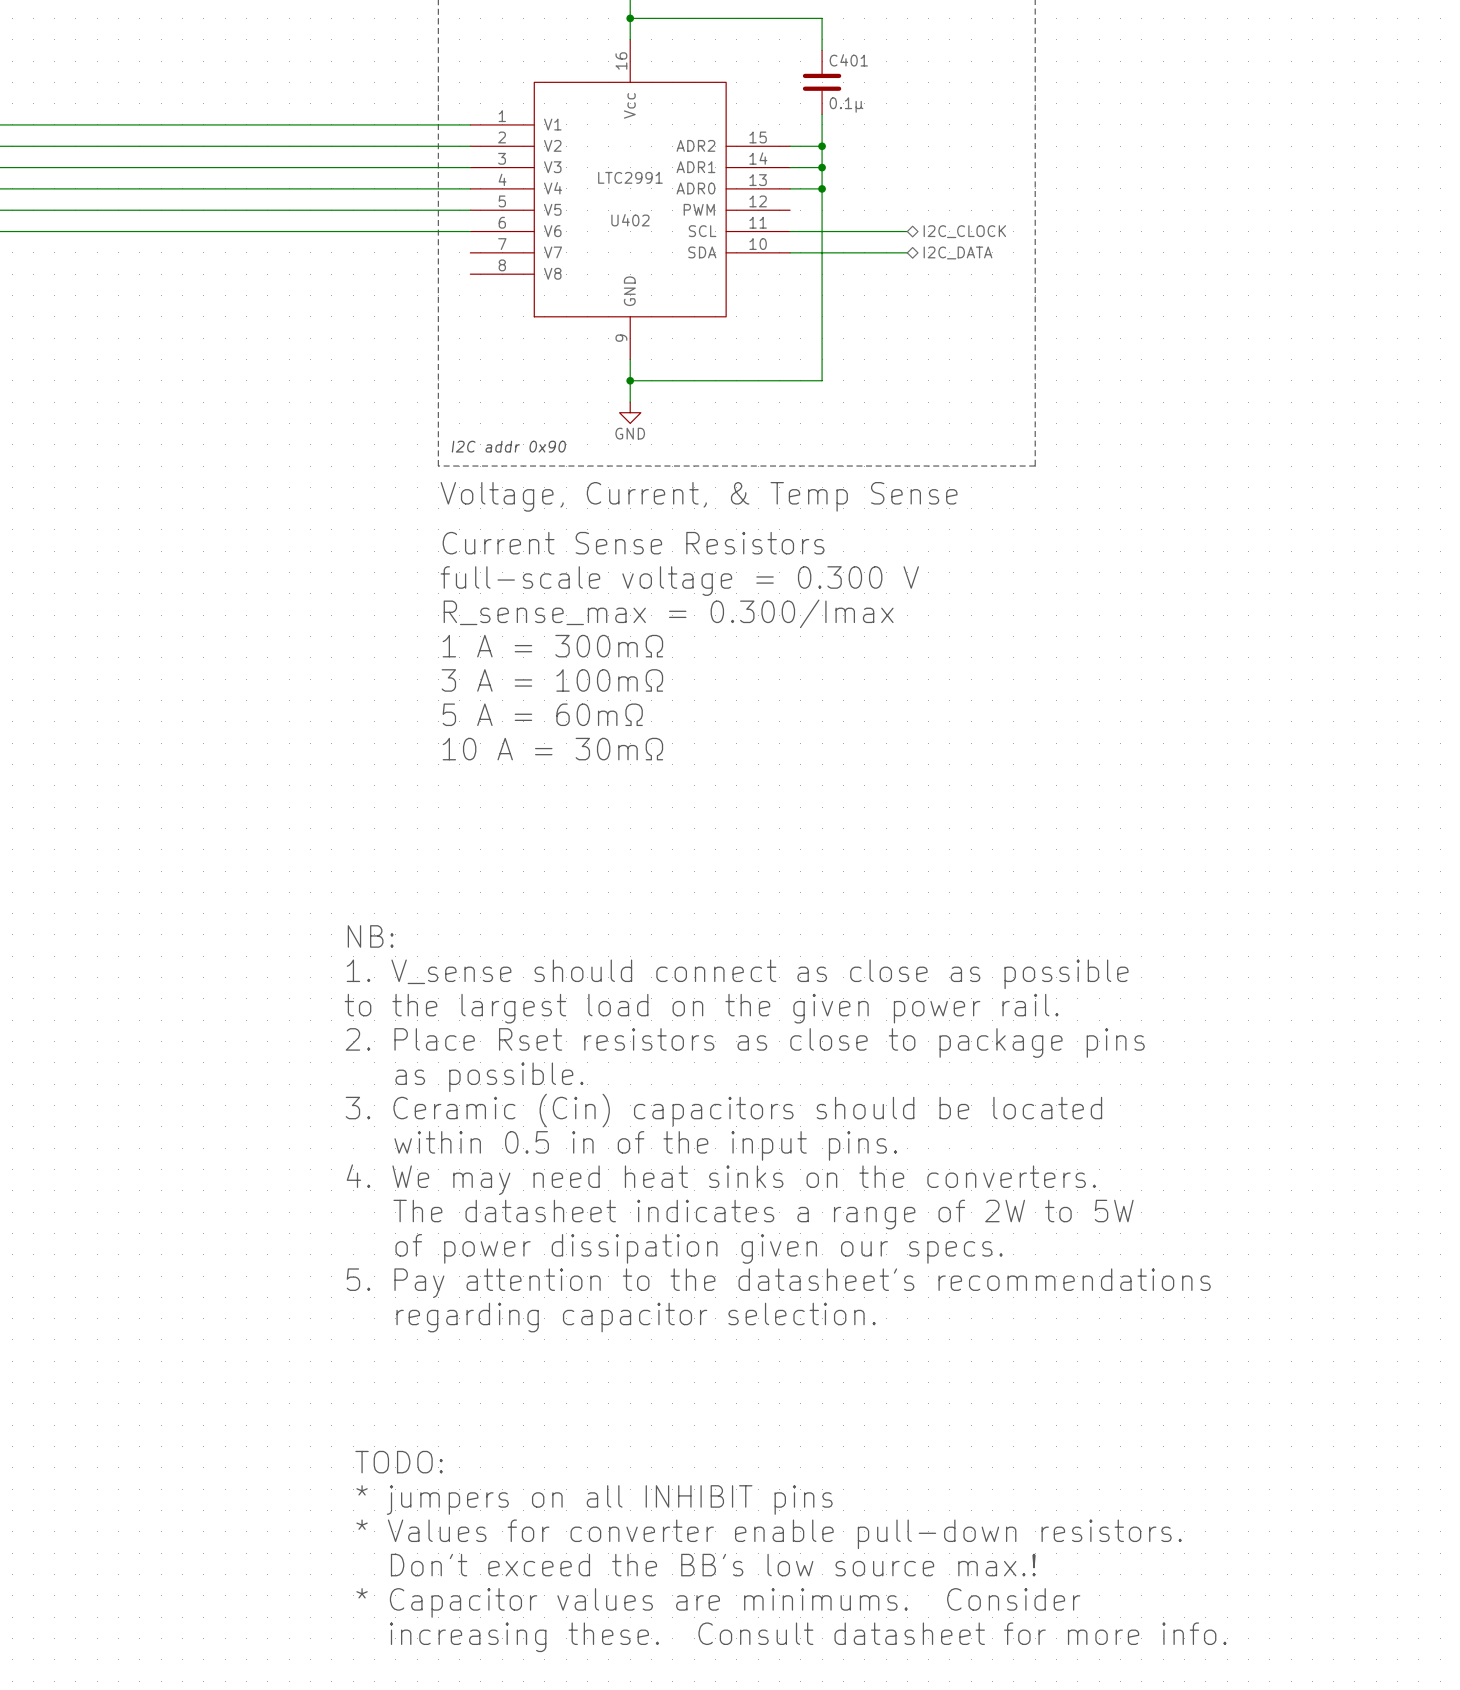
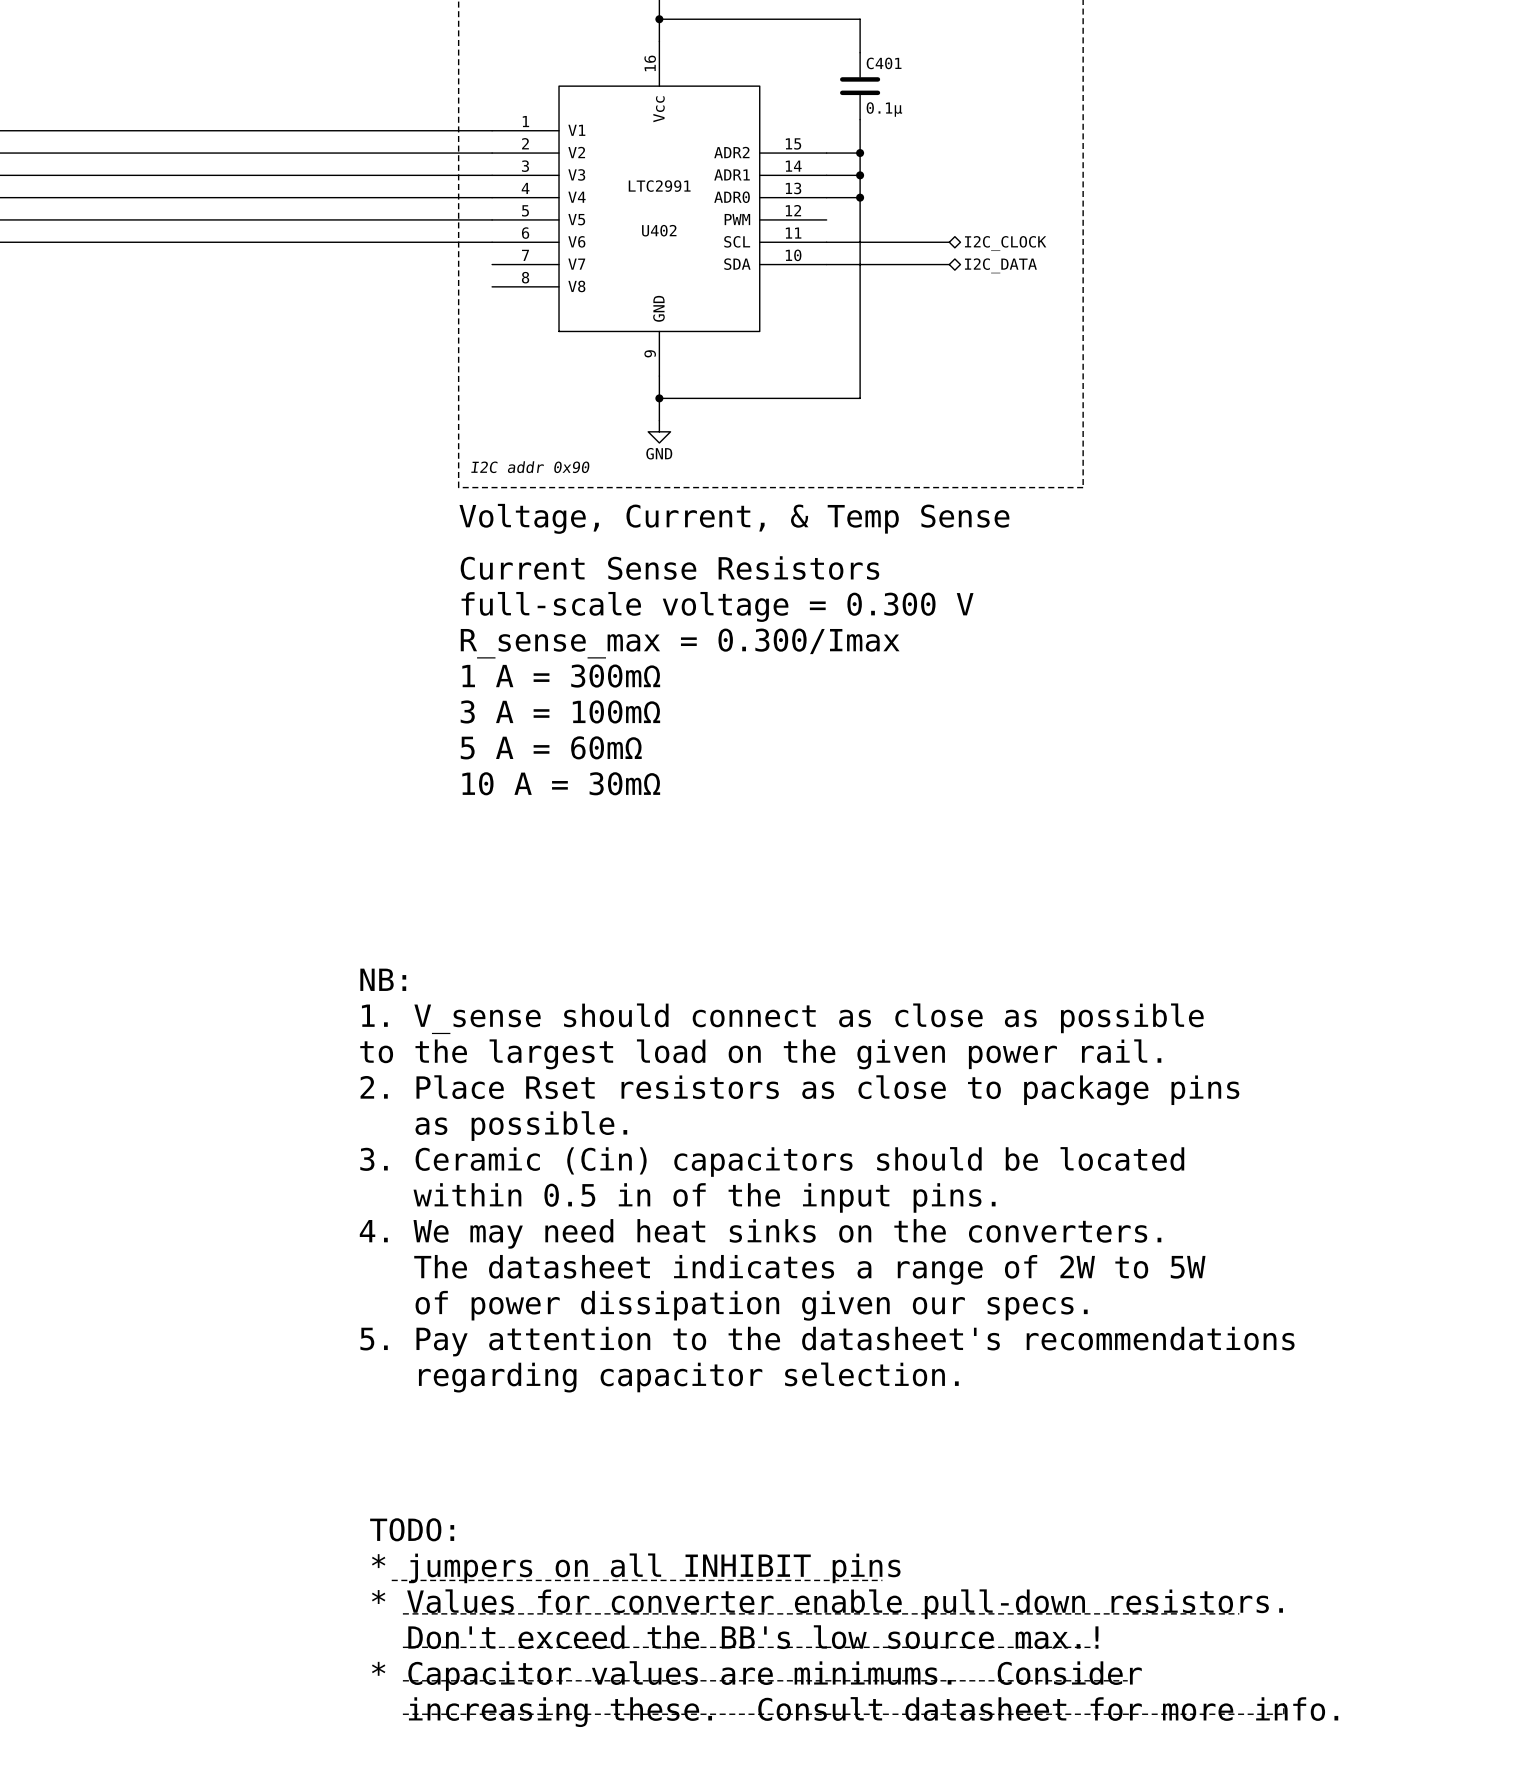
line: none -> (391, 1580) (882, 1580)
line: none -> (402, 1613) (1239, 1613)
line: none -> (402, 1647) (1094, 1647)
line: none -> (402, 1680) (1127, 1680)
line: none -> (1283, 1703) (1283, 1714) (402, 1714)

